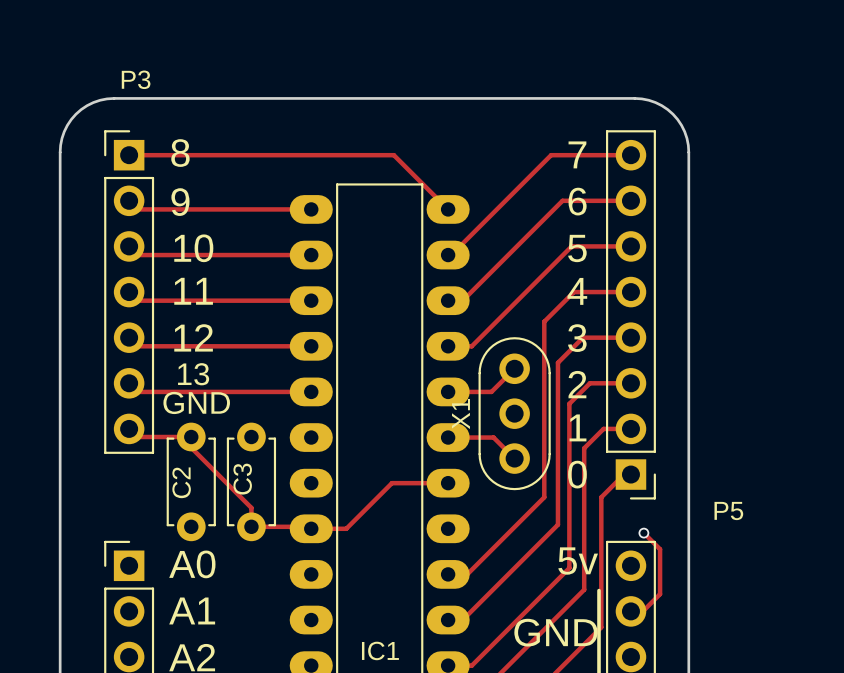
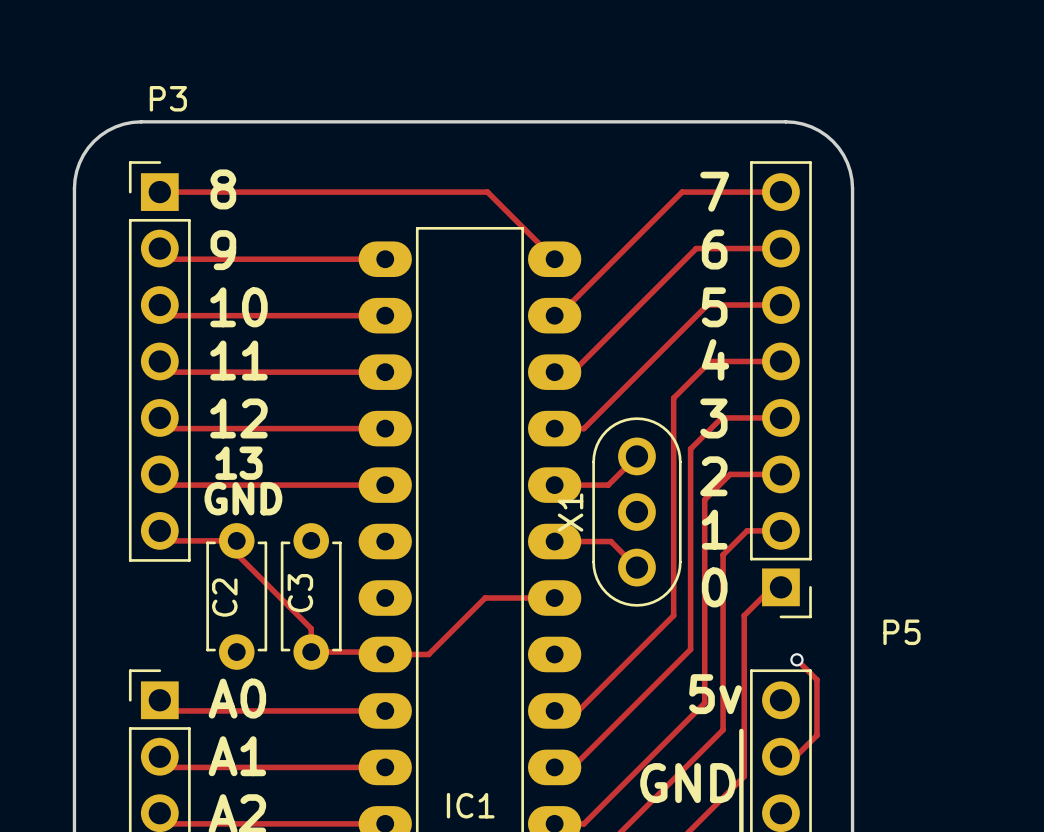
track: none -> (170, 710) (385, 710)
track: none -> (170, 767) (385, 767)
track: none -> (170, 823) (385, 823)

